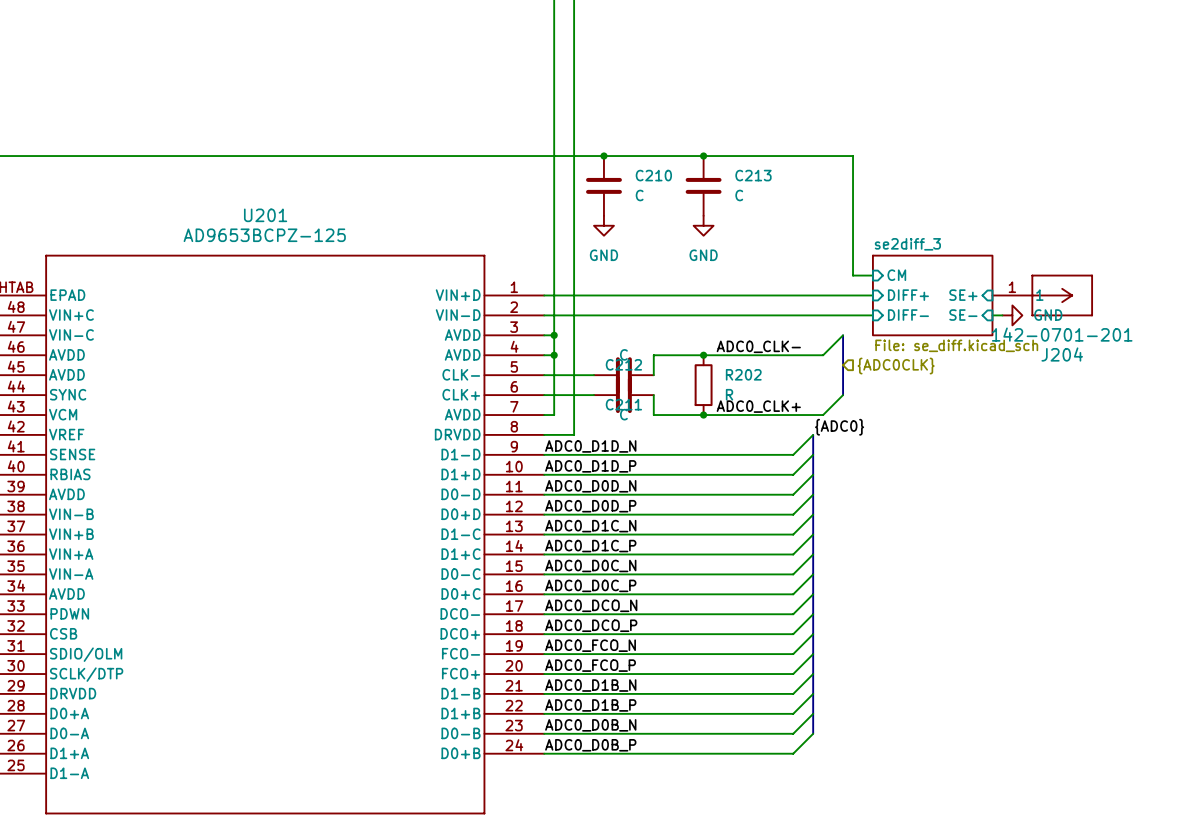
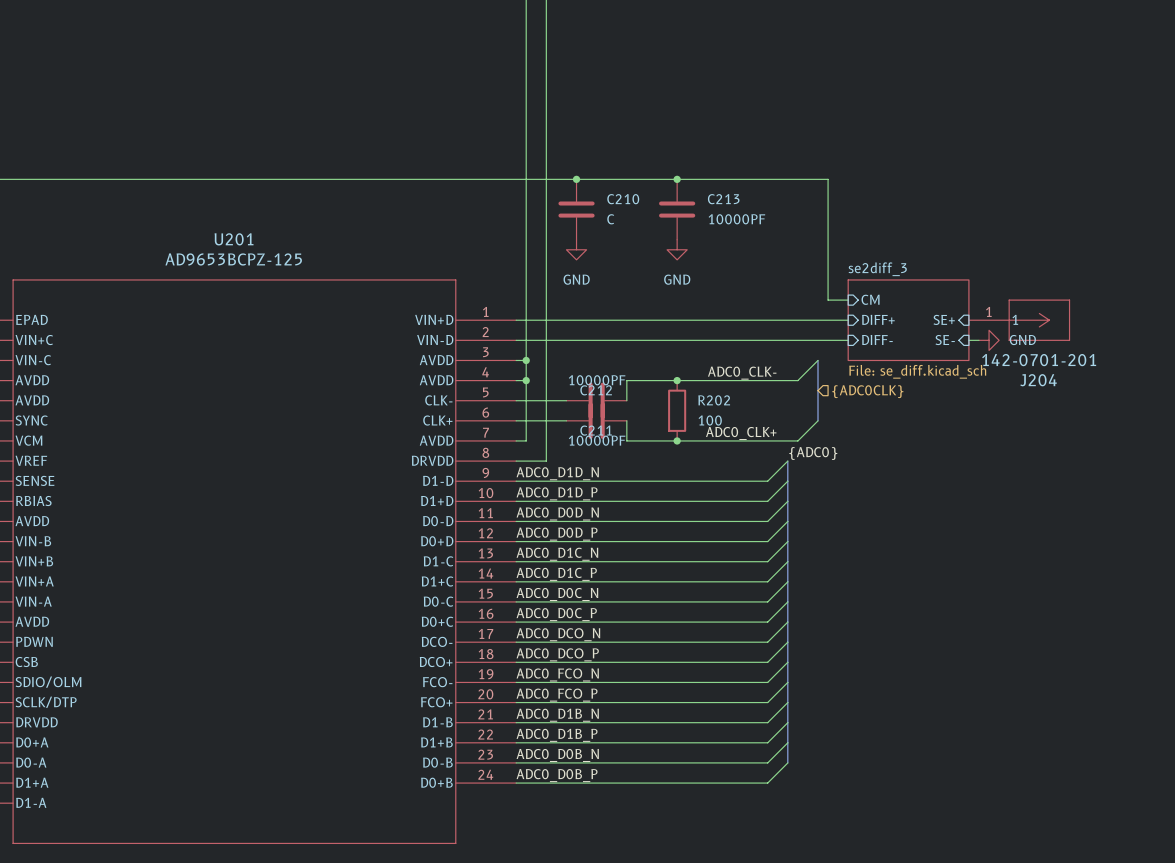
C213 value: C (739, 195) -> 10000PF (736, 219)
C212 value: C (623, 354) -> 10000PF (597, 380)
R202 value: R (729, 394) -> 100 (710, 420)
C211 value: C (623, 414) -> 10000PF (597, 440)

